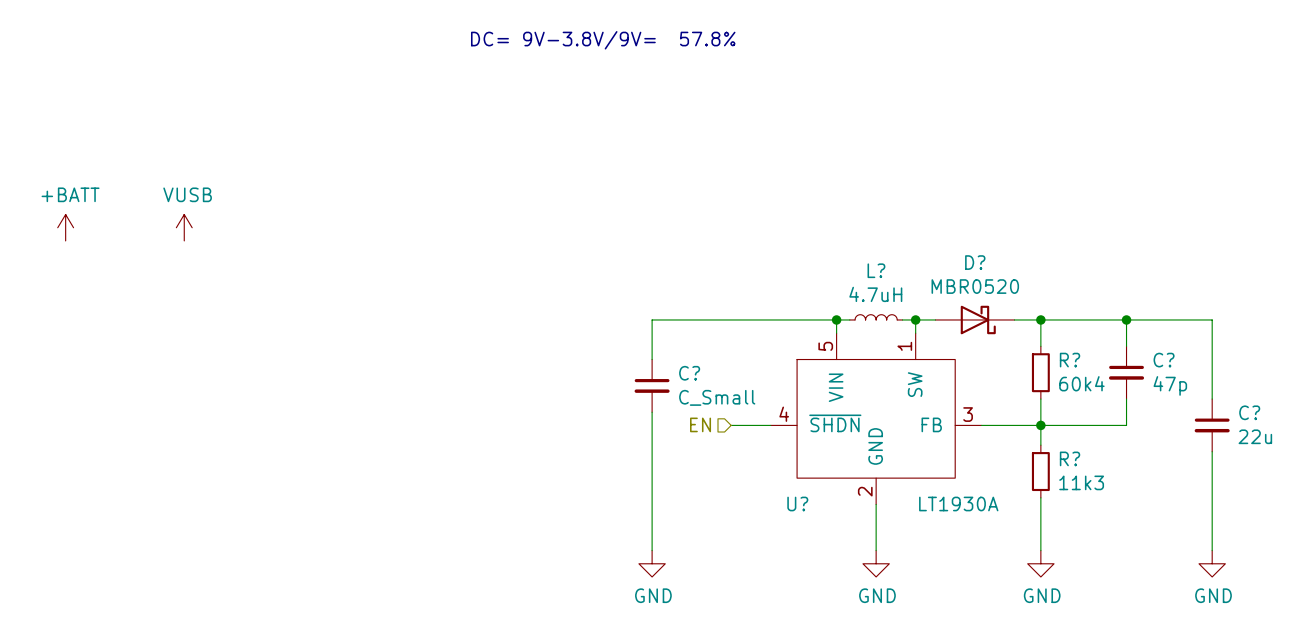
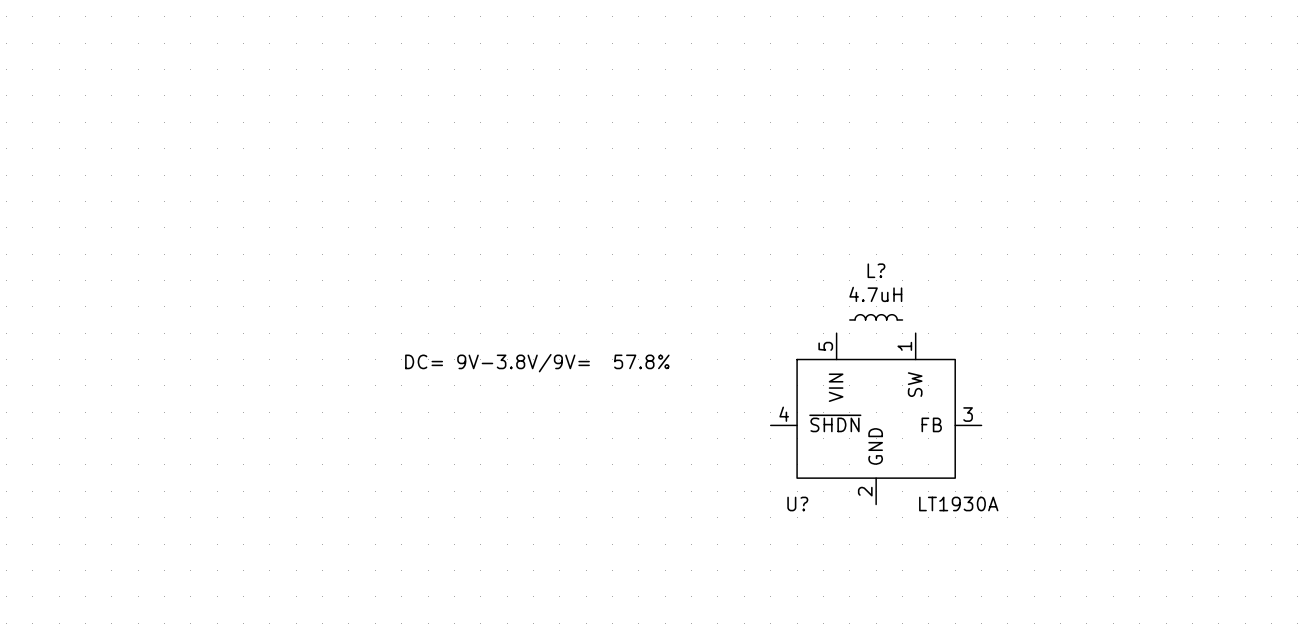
text: DC= 9V-3.8V/9V= 57.8% (603, 40) -> none
power symbol: +BATT (65, 227) -> none
power symbol: VUSB (184, 227) -> none
wire: (836, 319) (836, 333) -> none
junction: (836, 319) -> none
wire: (849, 319) (652, 319) (652, 359) -> none
wire: (902, 319) (935, 319) -> none
wire: (915, 319) (915, 333) -> none
junction: (915, 319) -> none
D?: MBR0520 (974, 319) -> none
wire: (1014, 319) (1212, 319) (1212, 399) -> none
wire: (1040, 319) (1040, 346) -> none
junction: (1040, 319) -> none
wire: (1126, 319) (1126, 346) -> none
junction: (1126, 319) -> none
text: none -> DC= 9V-3.8V/9V= 57.8% (537, 363)
R?: 60k4 (1040, 372) -> none
C?: 47p (1126, 372) -> none
C?: C_Small (652, 385) -> none
wire: (1040, 399) (1040, 445) -> none
wire: (1126, 399) (1126, 425) (981, 425) -> none
wire: (652, 412) (652, 550) -> none
hierarchical label: EN (700, 424) -> none
wire: (731, 425) (770, 425) -> none
junction: (1040, 425) -> none
C?: 22u (1212, 425) -> none
wire: (1212, 451) (1212, 550) -> none
R?: 11k3 (1040, 471) -> none
wire: (1040, 497) (1040, 550) -> none
wire: (876, 504) (876, 550) -> none
power symbol: GND (652, 563) -> none
power symbol: GND (876, 563) -> none
power symbol: GND (1040, 563) -> none
power symbol: GND (1212, 563) -> none

